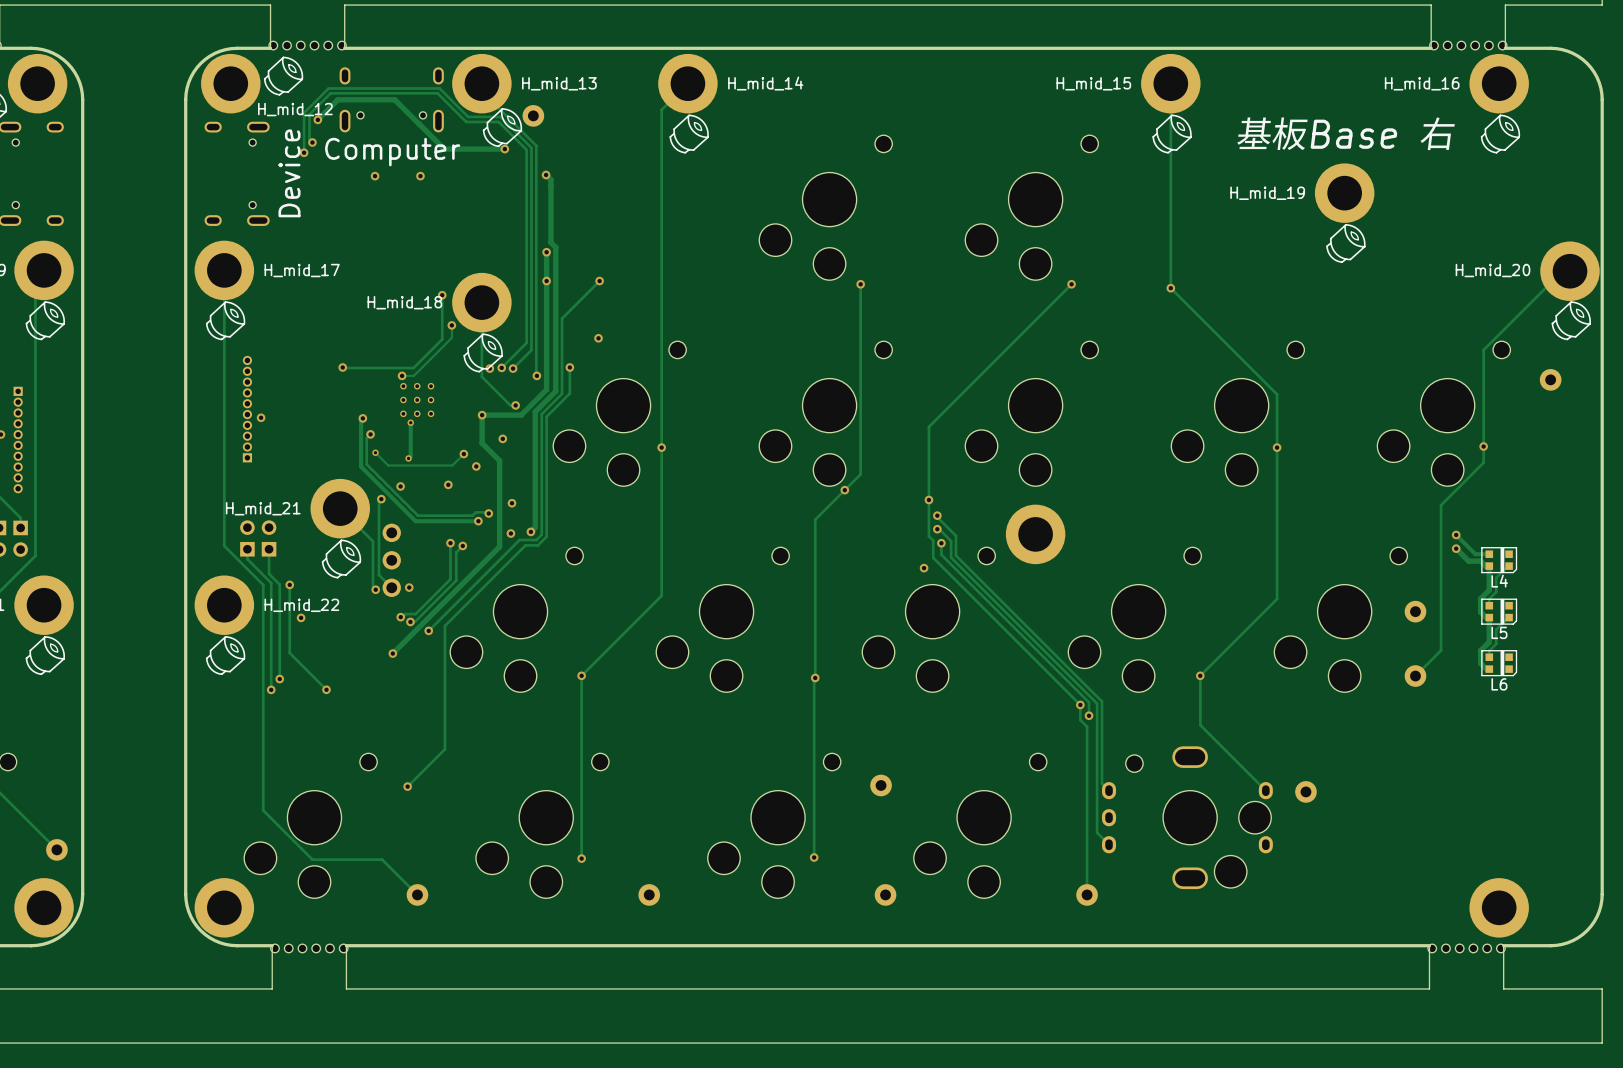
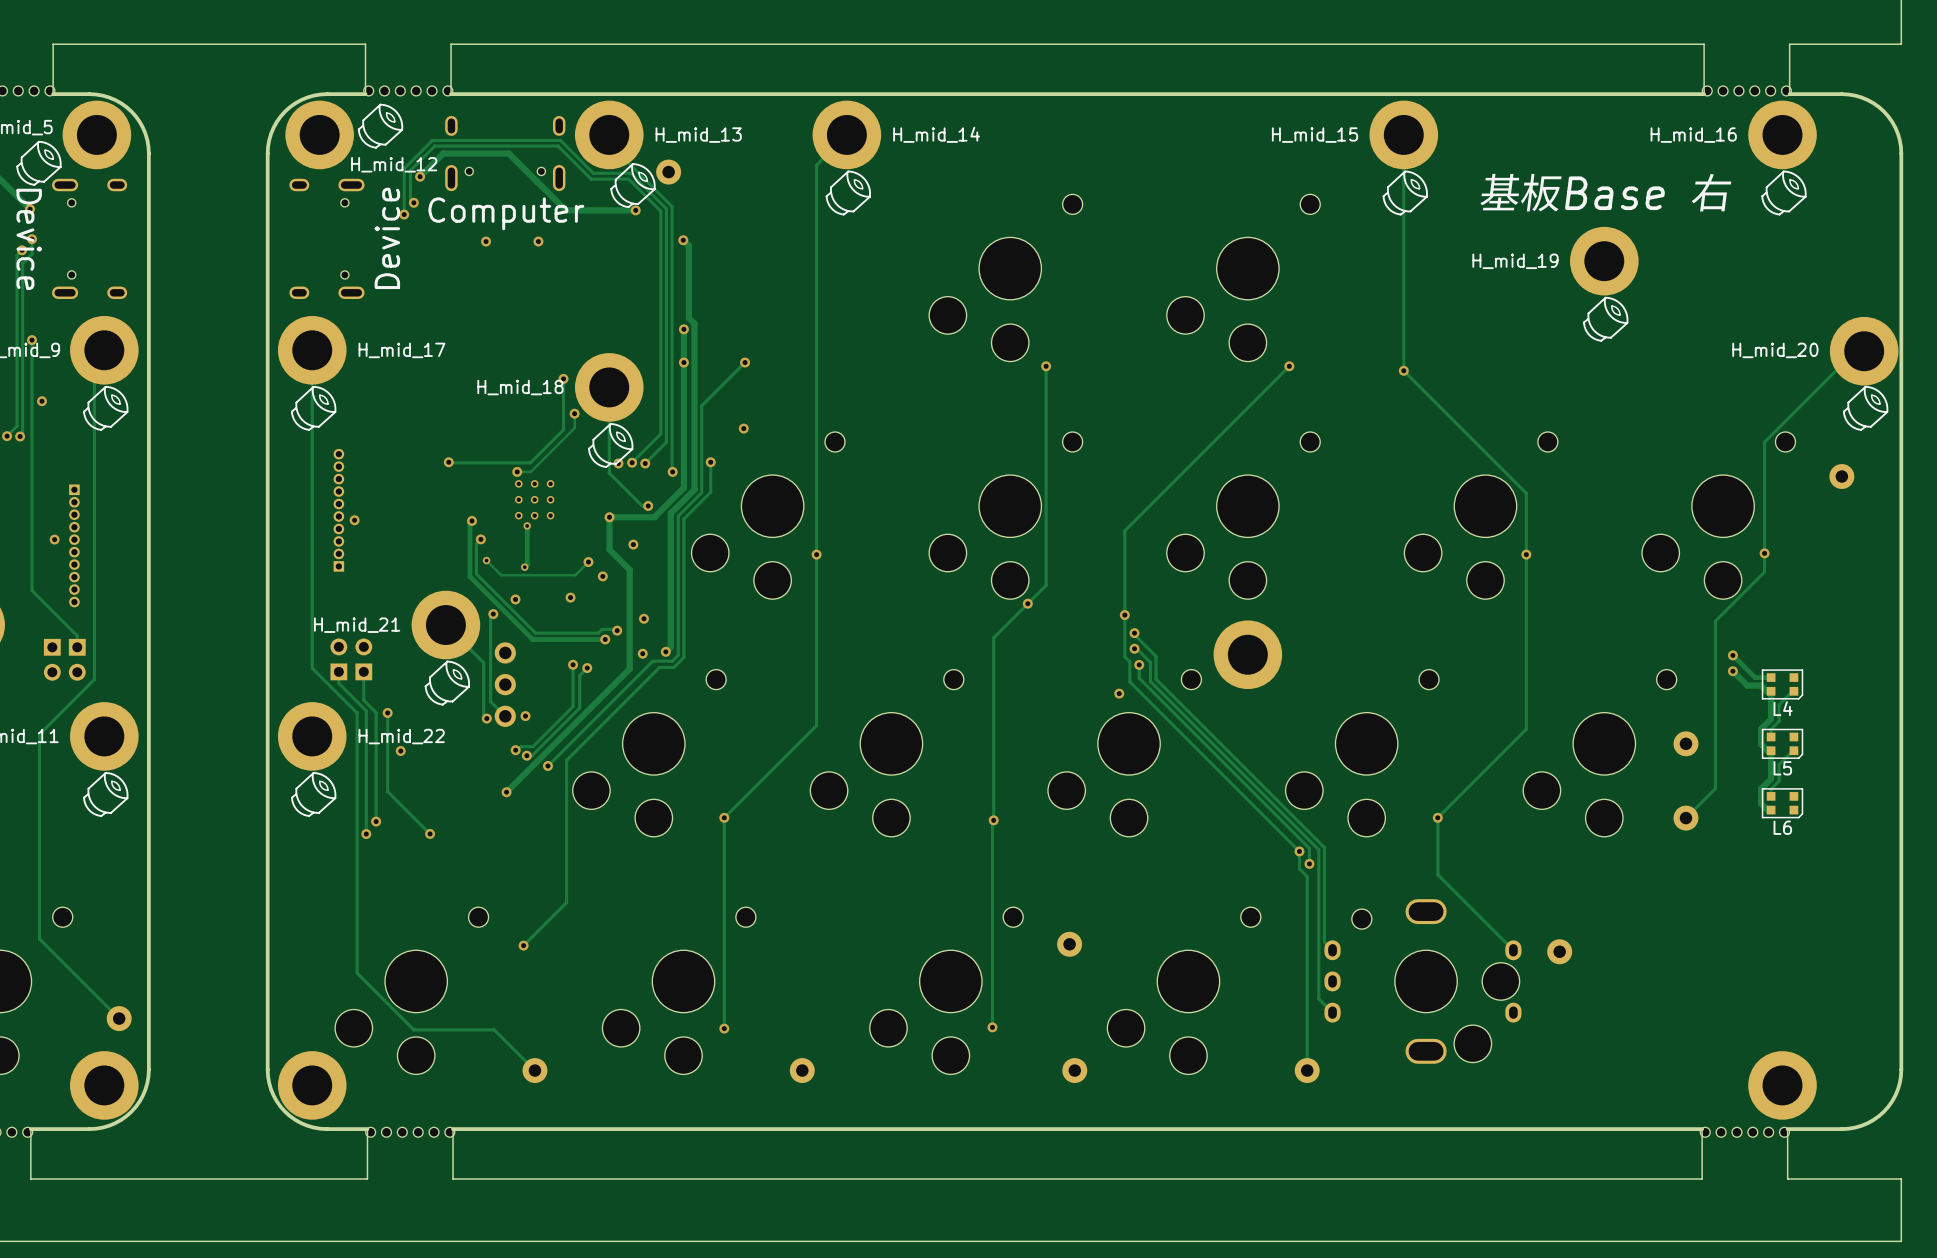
L4 footprint: [1481, 547, 1518, 574] -> [1761, 669, 1804, 700]
L5 footprint: [1481, 598, 1518, 625] -> [1761, 728, 1804, 759]
L6 footprint: [1481, 650, 1518, 677] -> [1761, 788, 1804, 819]

